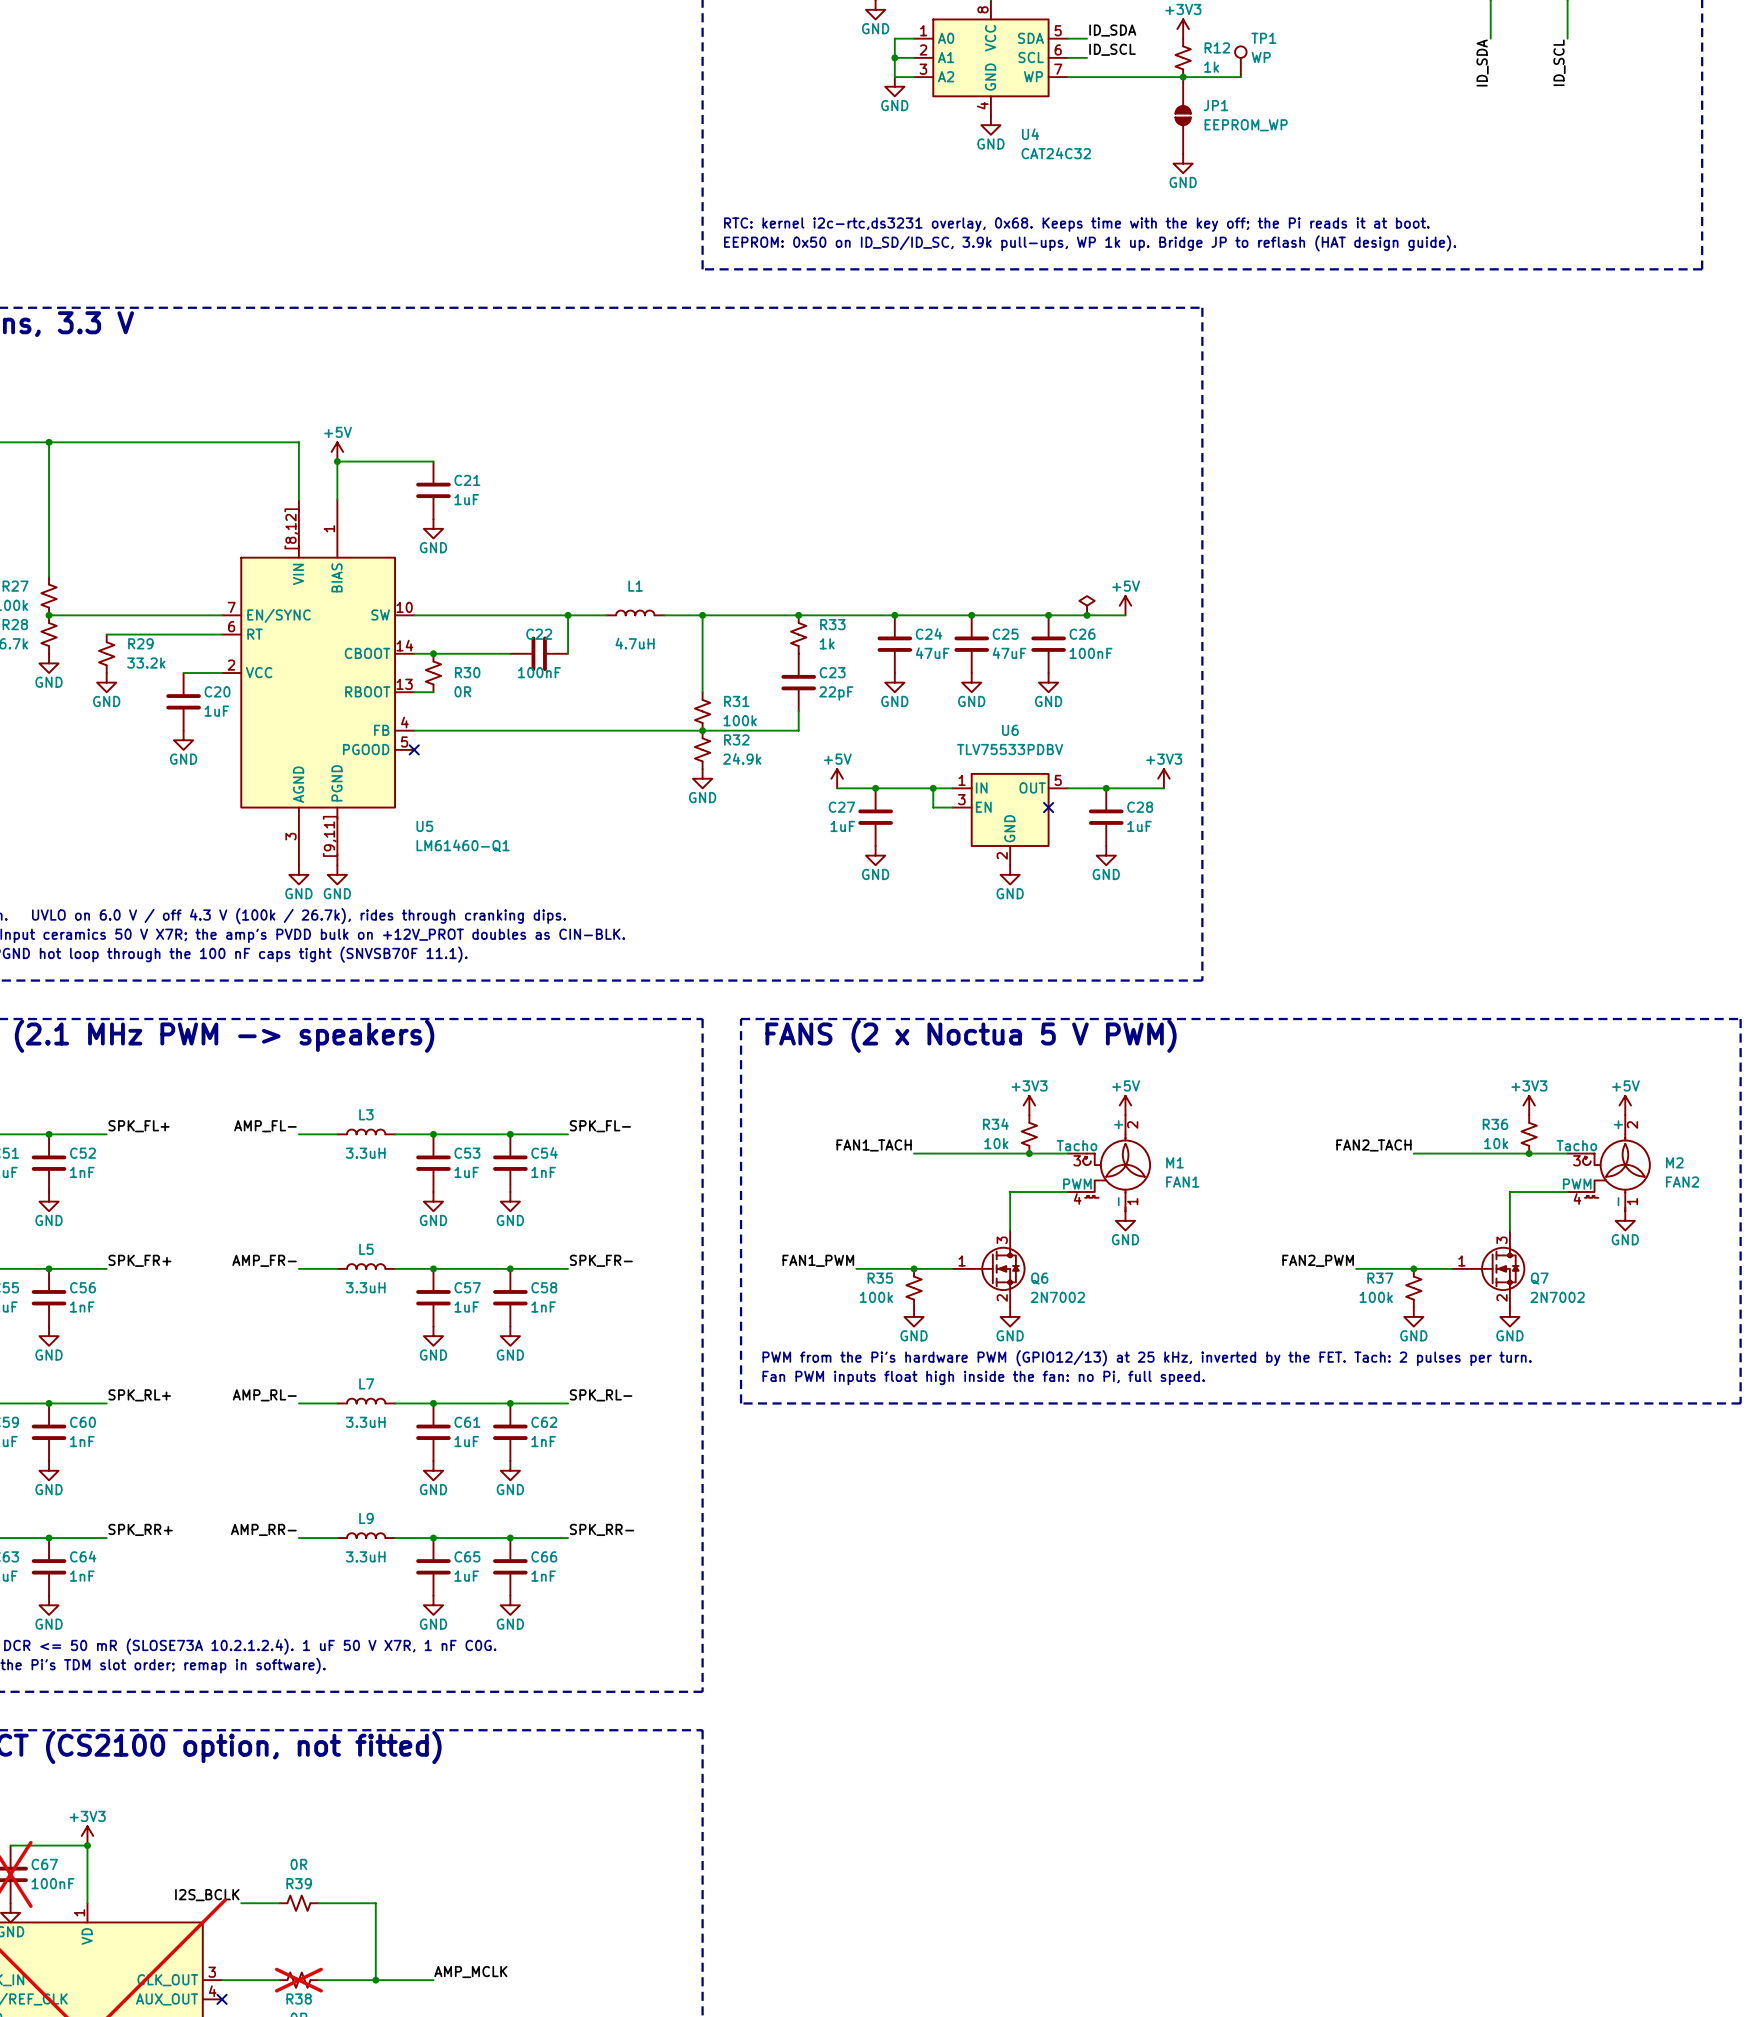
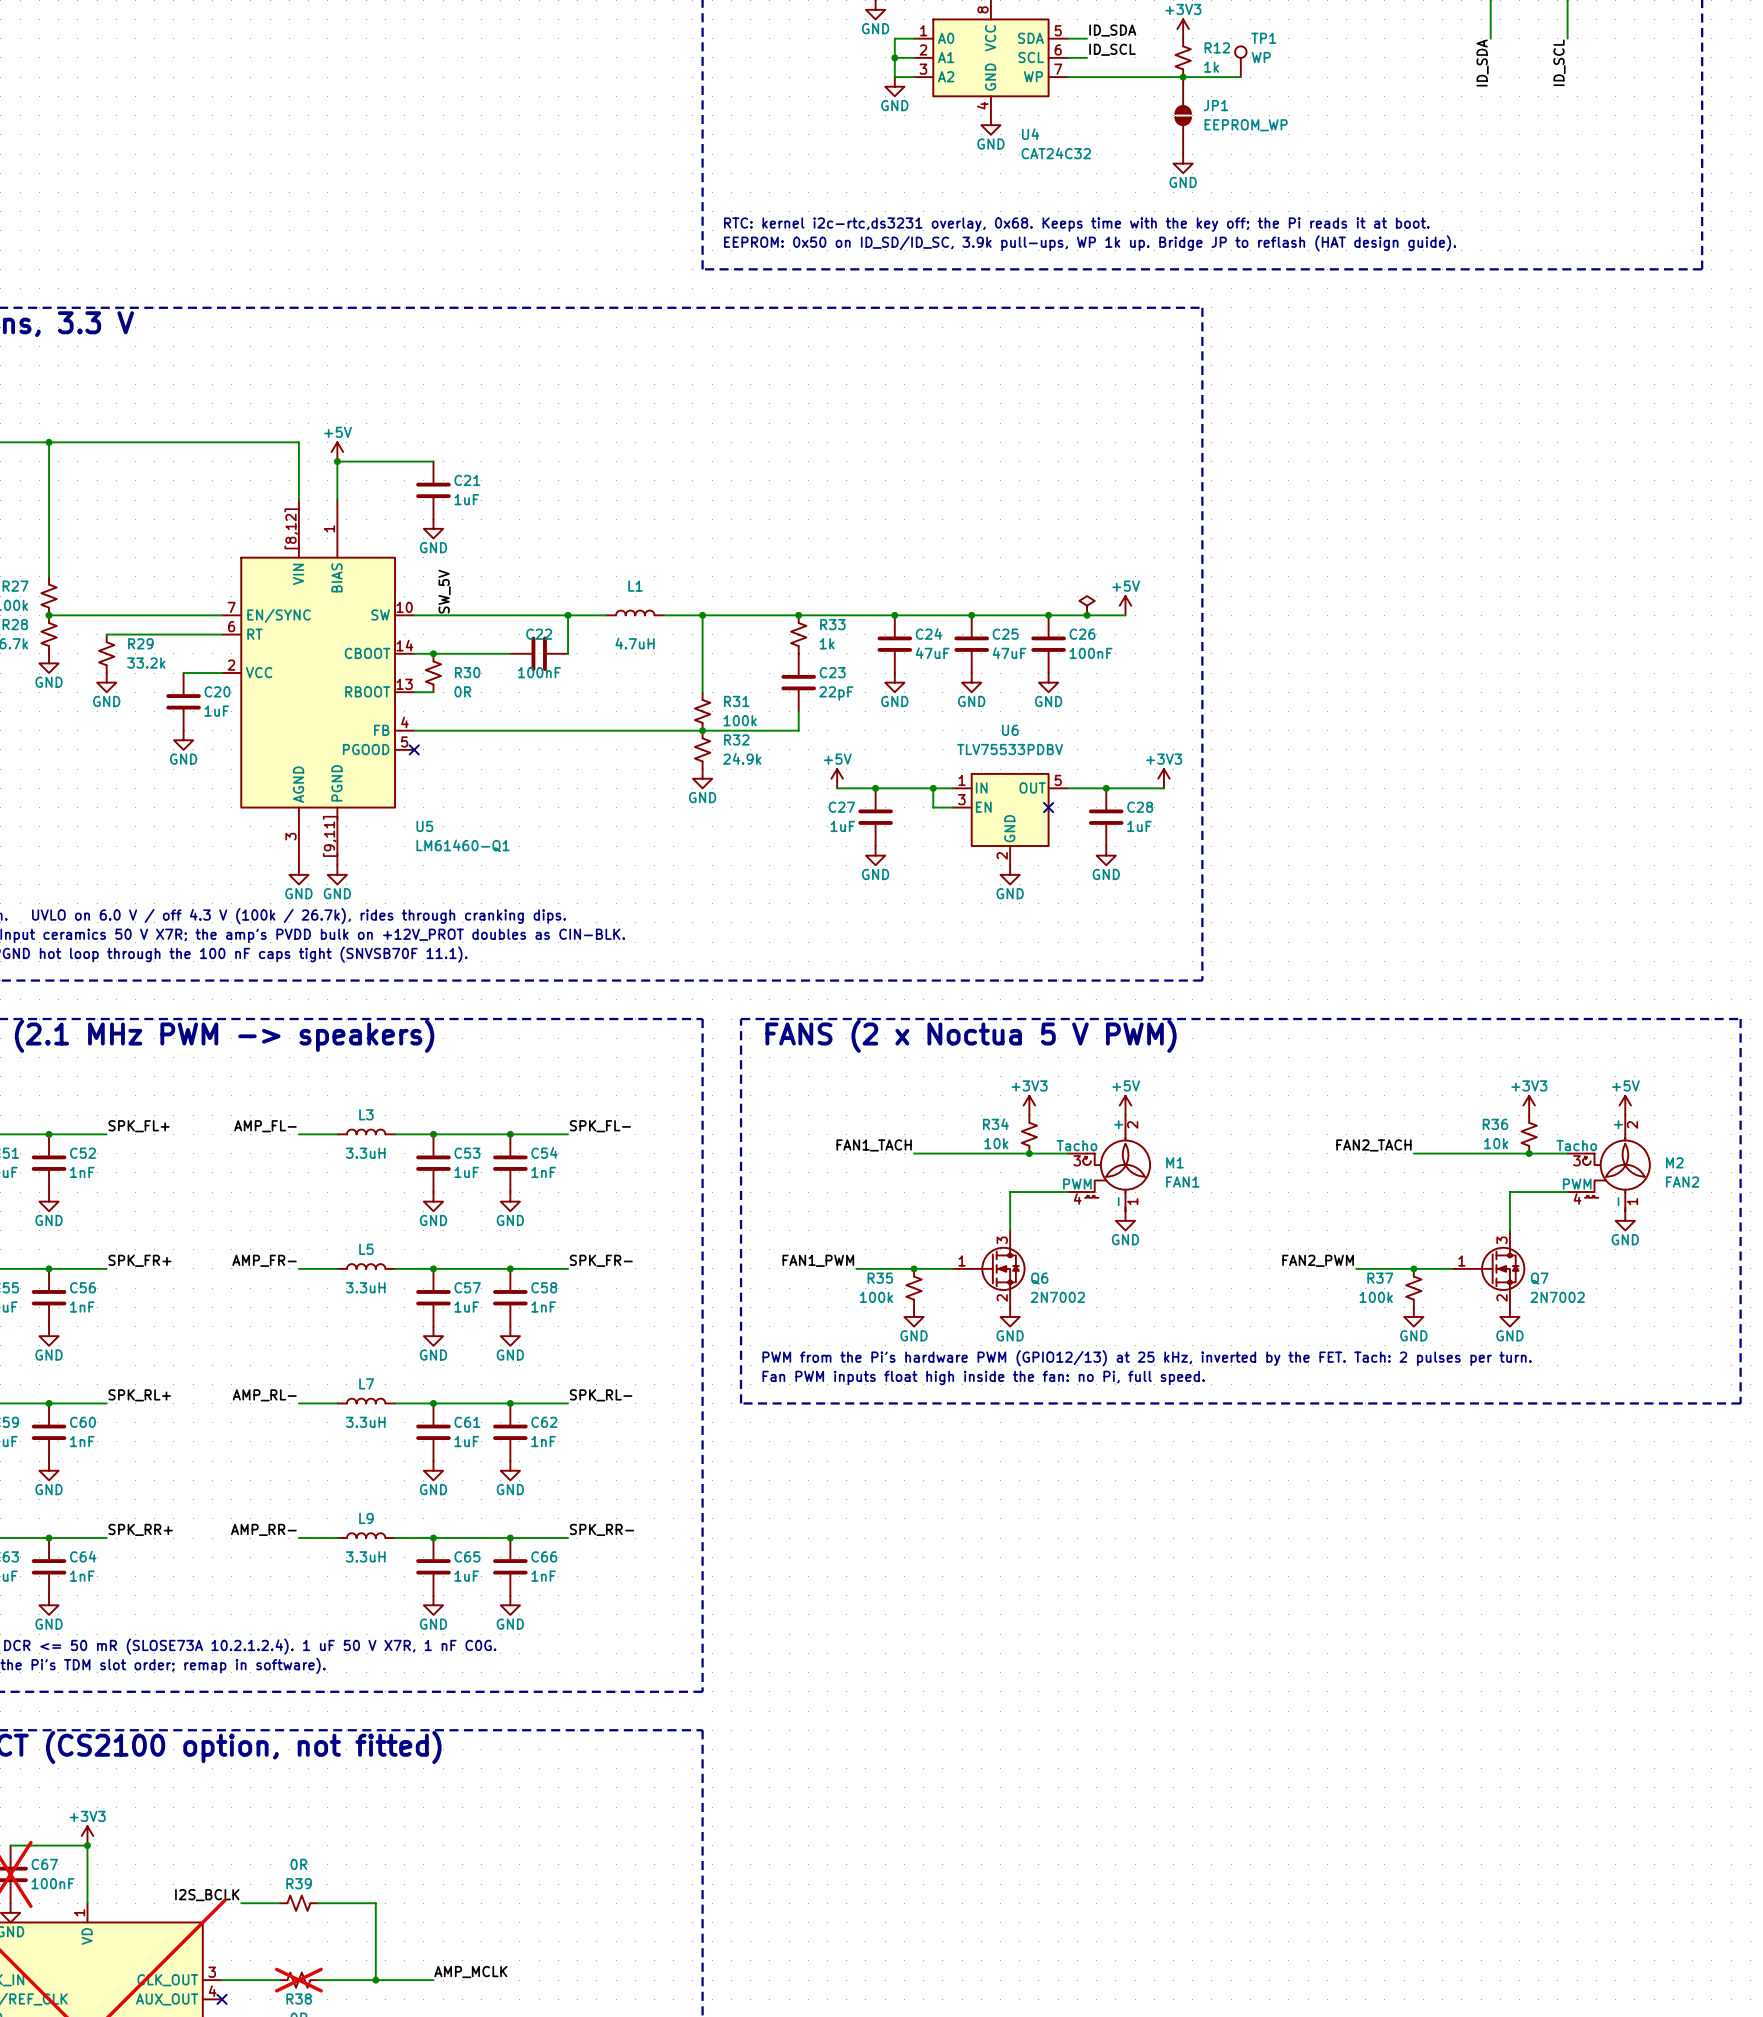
label: none -> SW_5V (444, 591)

